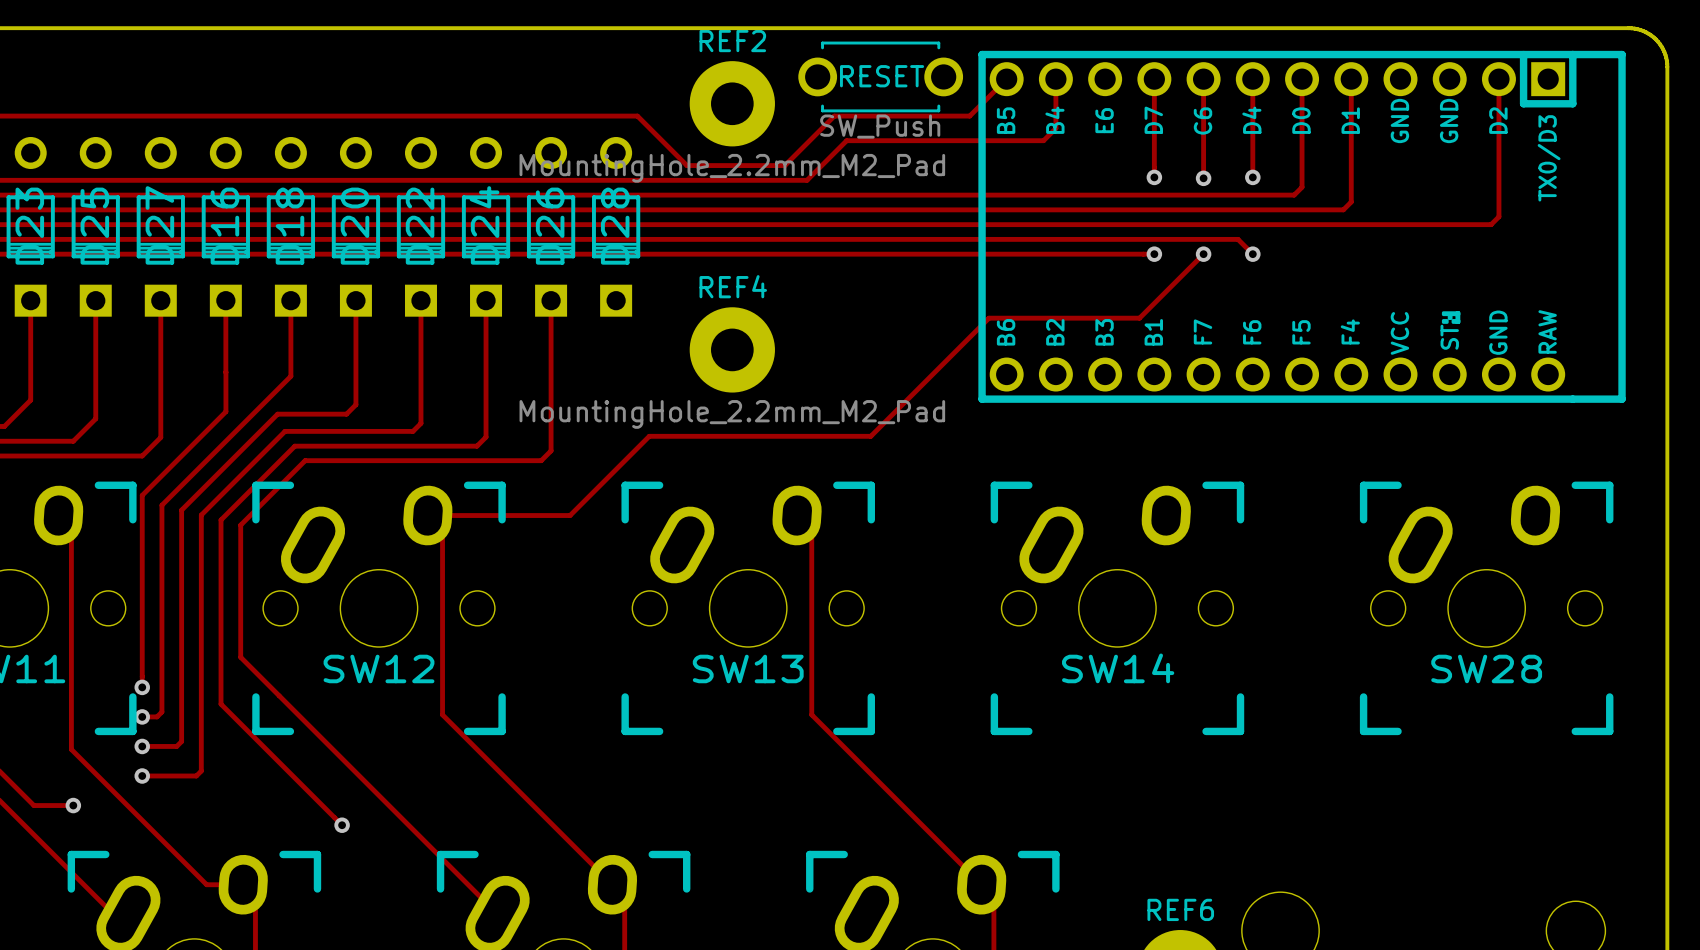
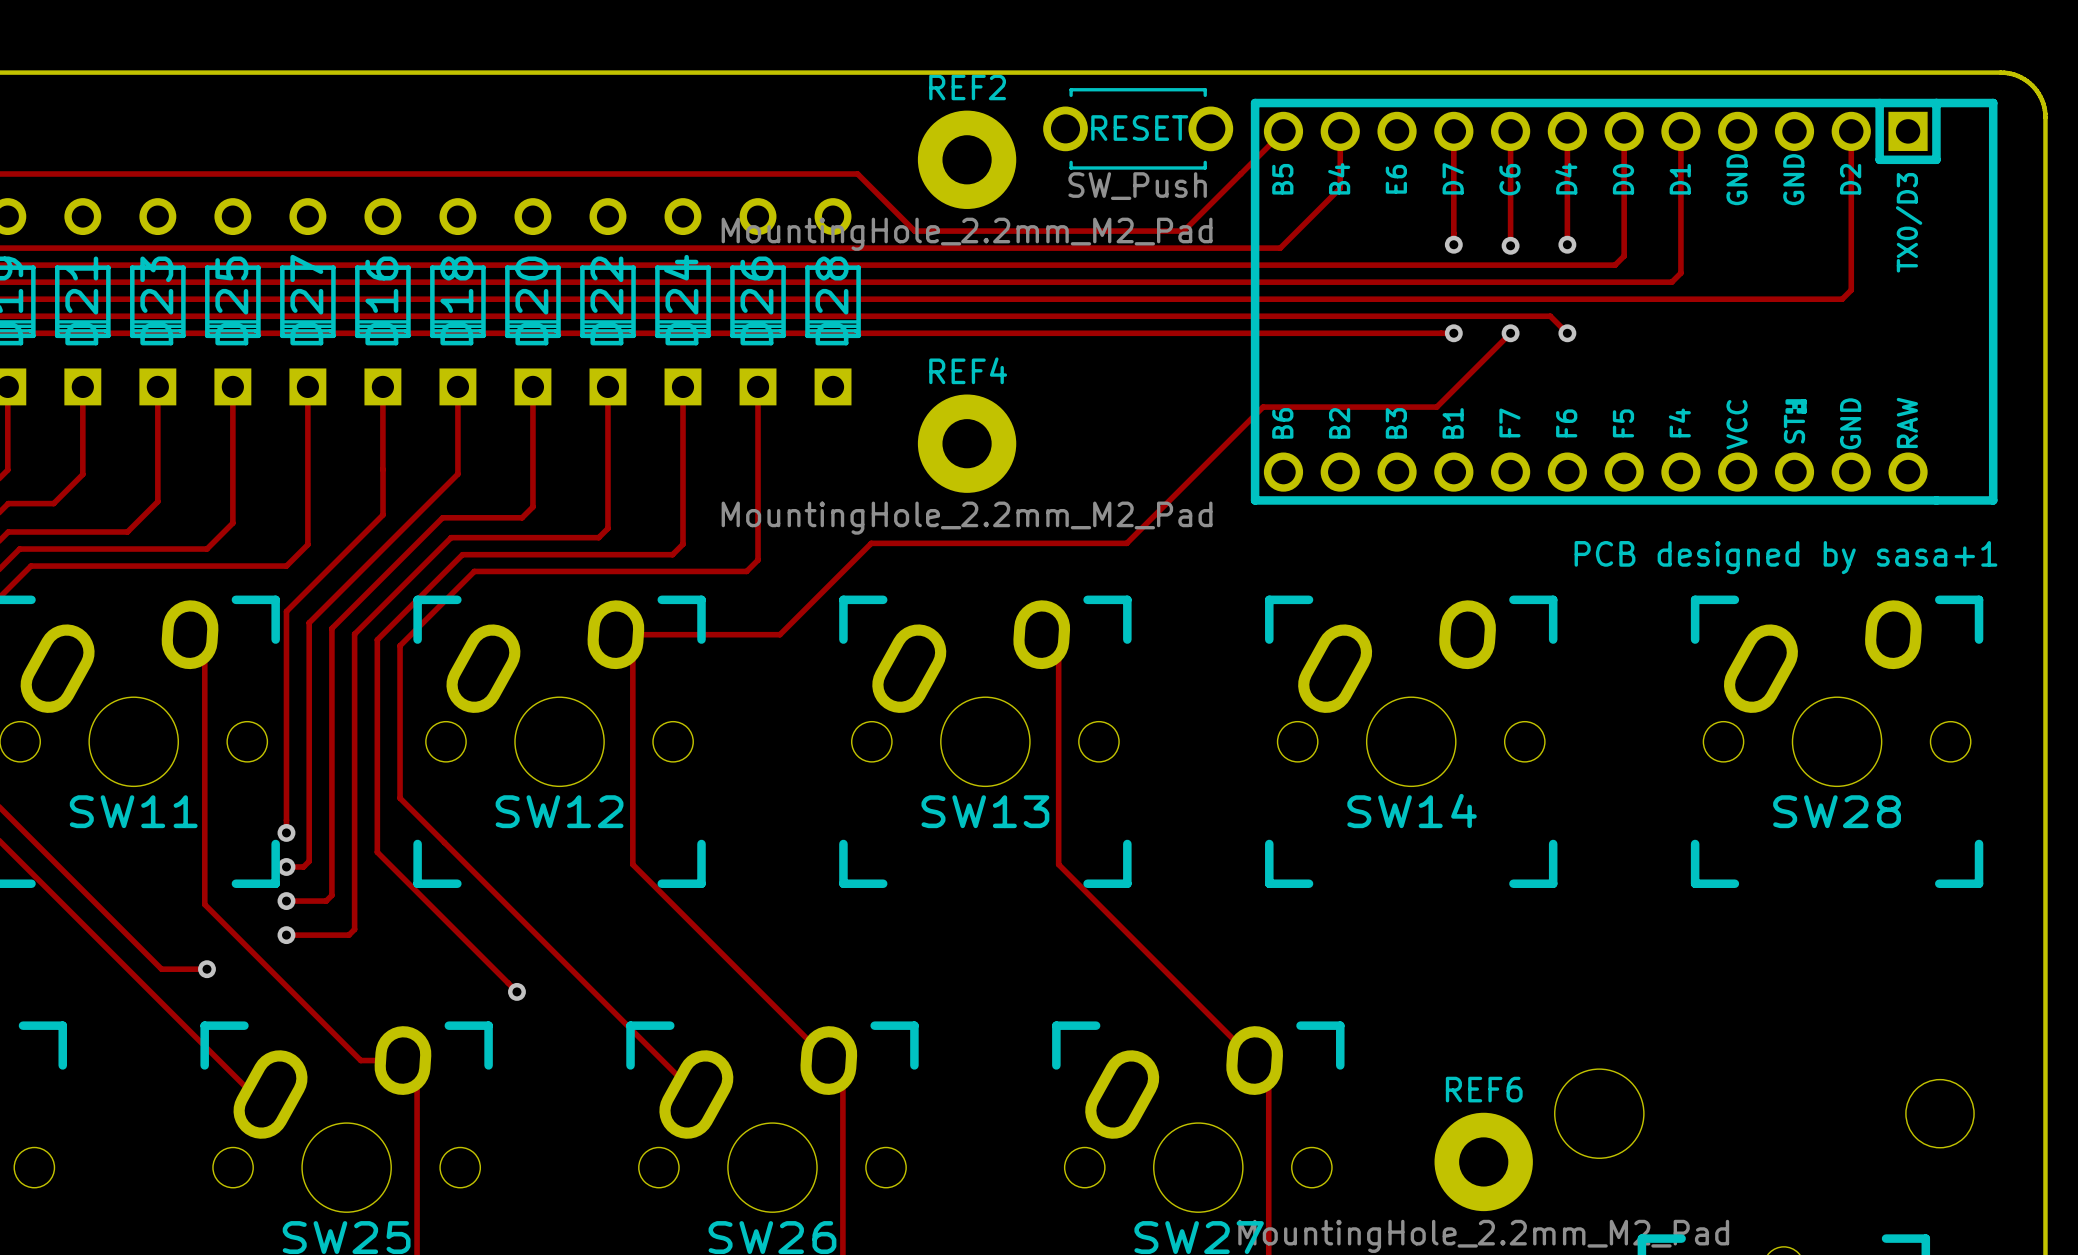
track: (969, 116) (834, 116) (784, 165) -> (1240, 173) (1183, 231) (1027, 231)
track: (1043, 140) (846, 140) (807, 180) -> (1326, 202) (1280, 248) (1053, 248)
text: none -> PCB designed by sasa+1 (1785, 557)

